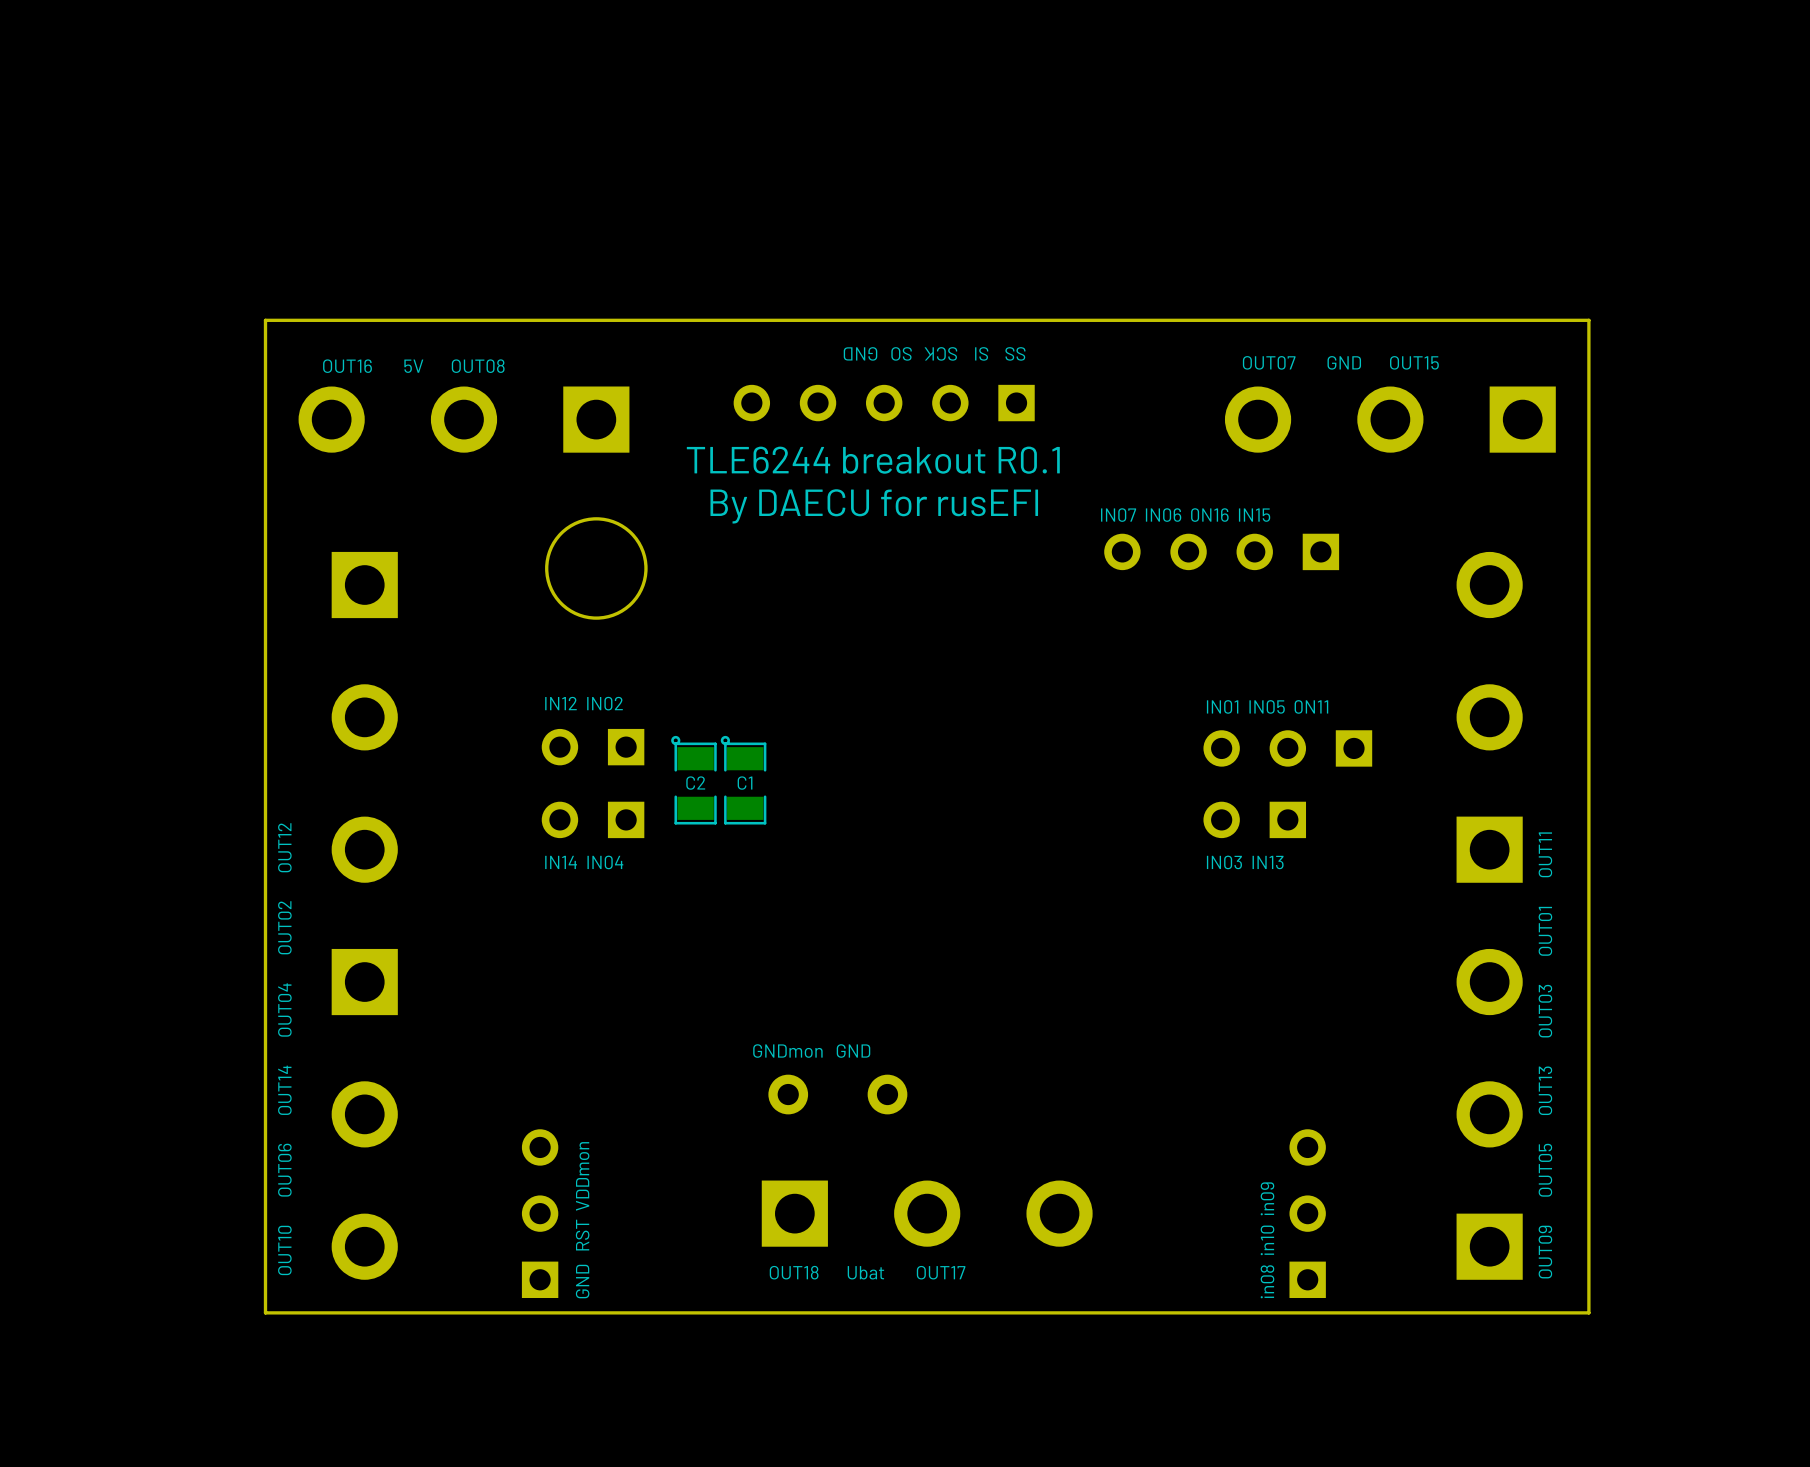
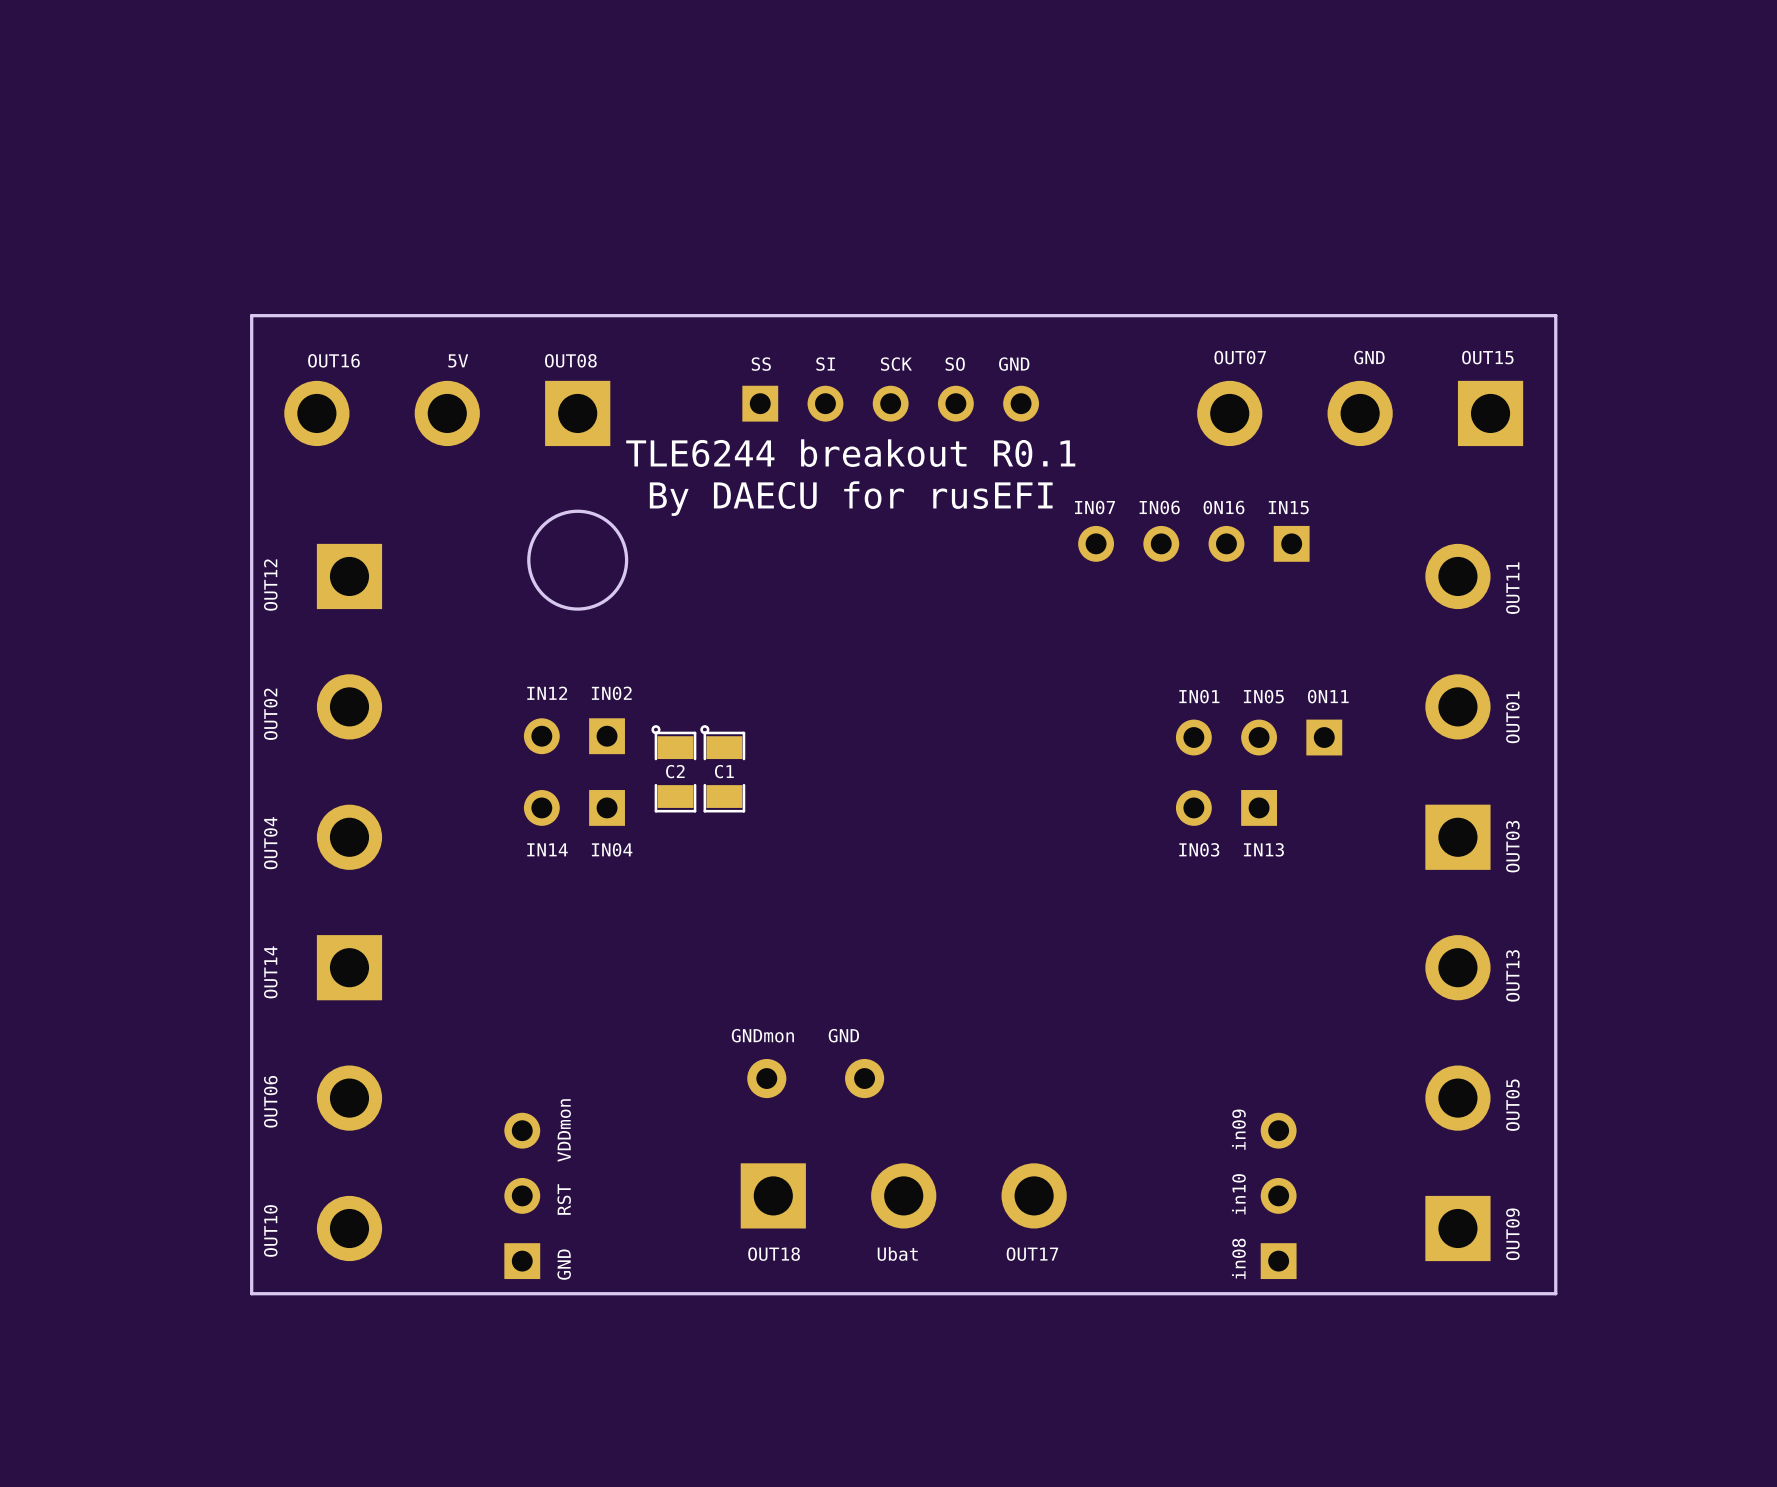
text rotation: 0° (934, 353) -> 180° (890, 364)
part rotation: 0° (884, 403) -> 180° (890, 403)

